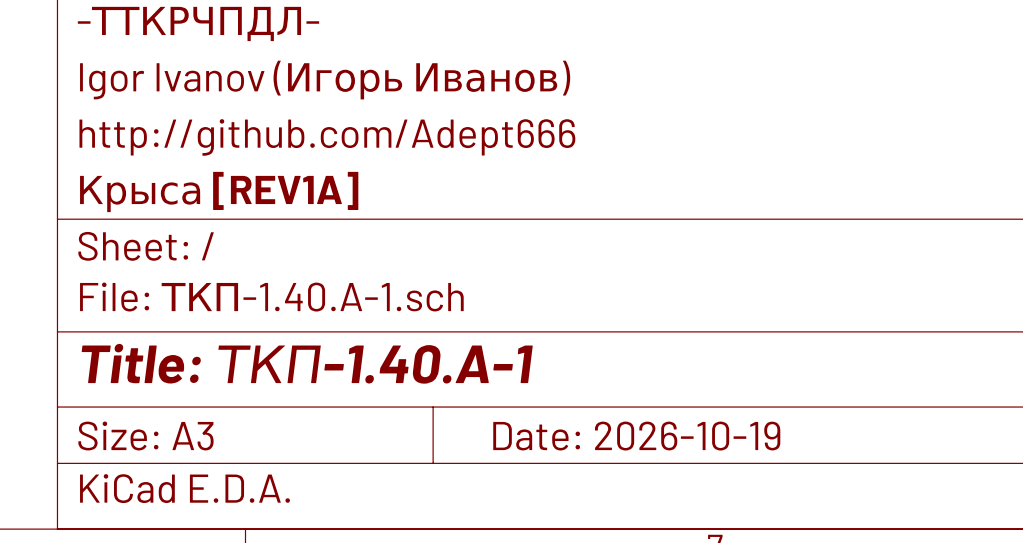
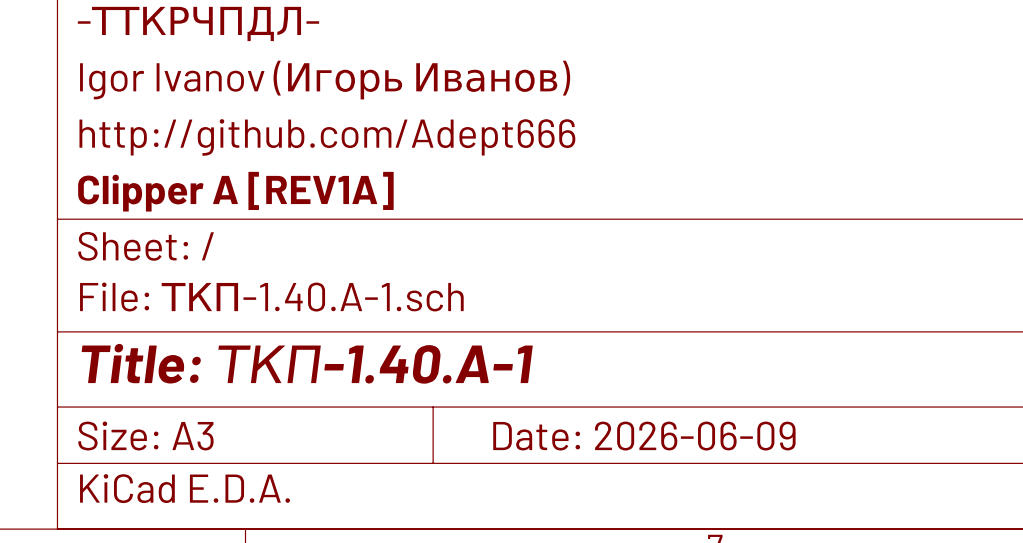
title block: Крыса [REV1A] (219, 191) -> Clipper A [REV1A] (235, 191)
title block: Date: 2026-10-19 (636, 436) -> Date: 2026-06-09 (644, 436)

